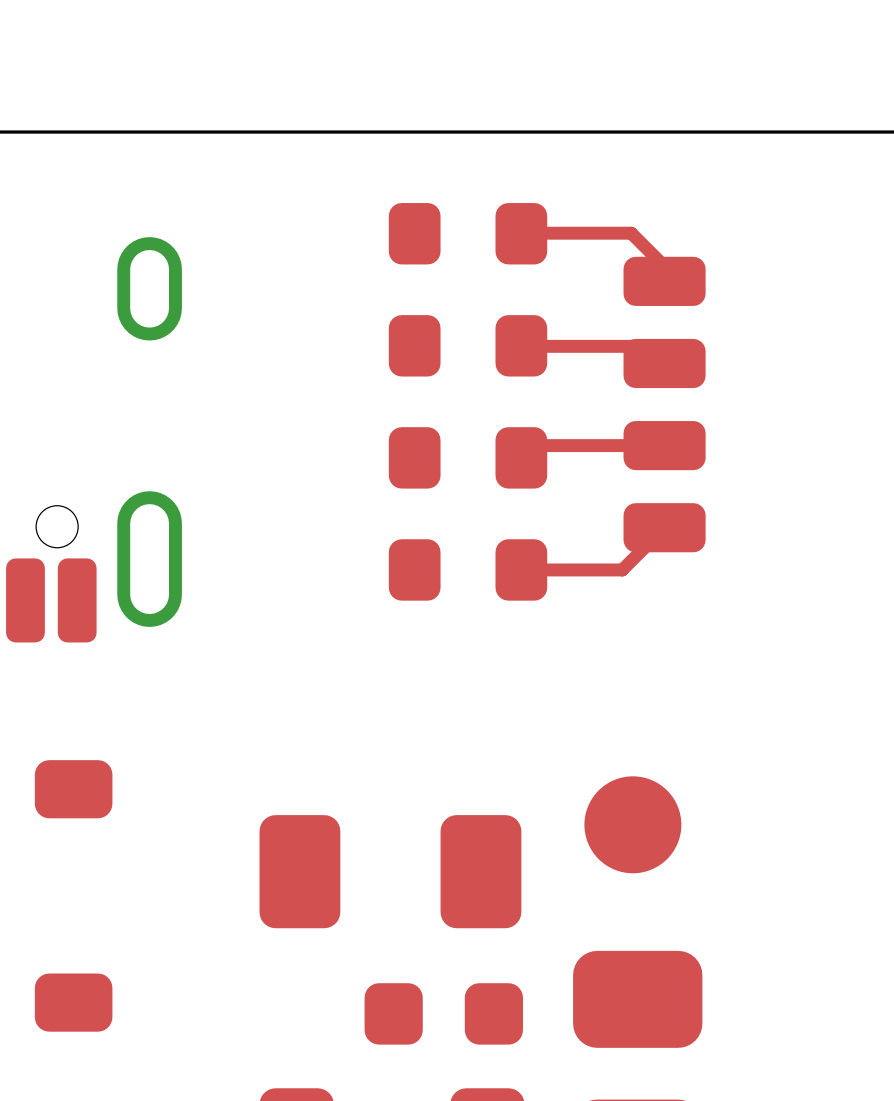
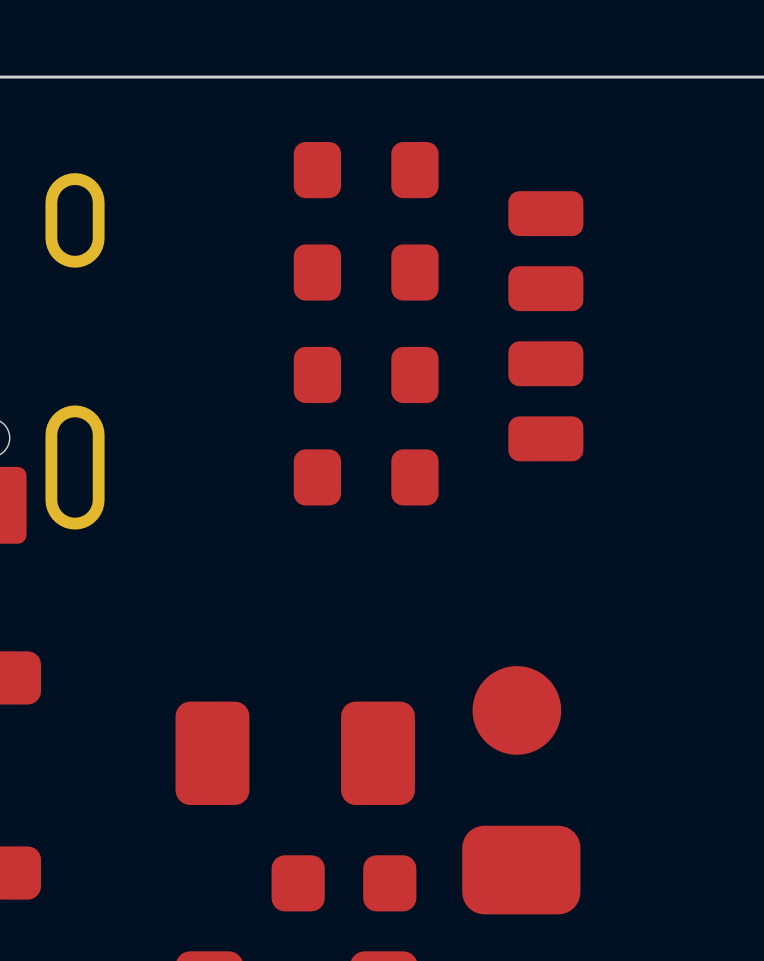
top track: (521, 233) (631, 233) (664, 266) (664, 281) -> none
top track: (521, 346) (647, 346) (664, 363) -> none
top track: (664, 445) (533, 445) (521, 457) -> none
top track: (664, 527) (622, 569) (521, 569) -> none

